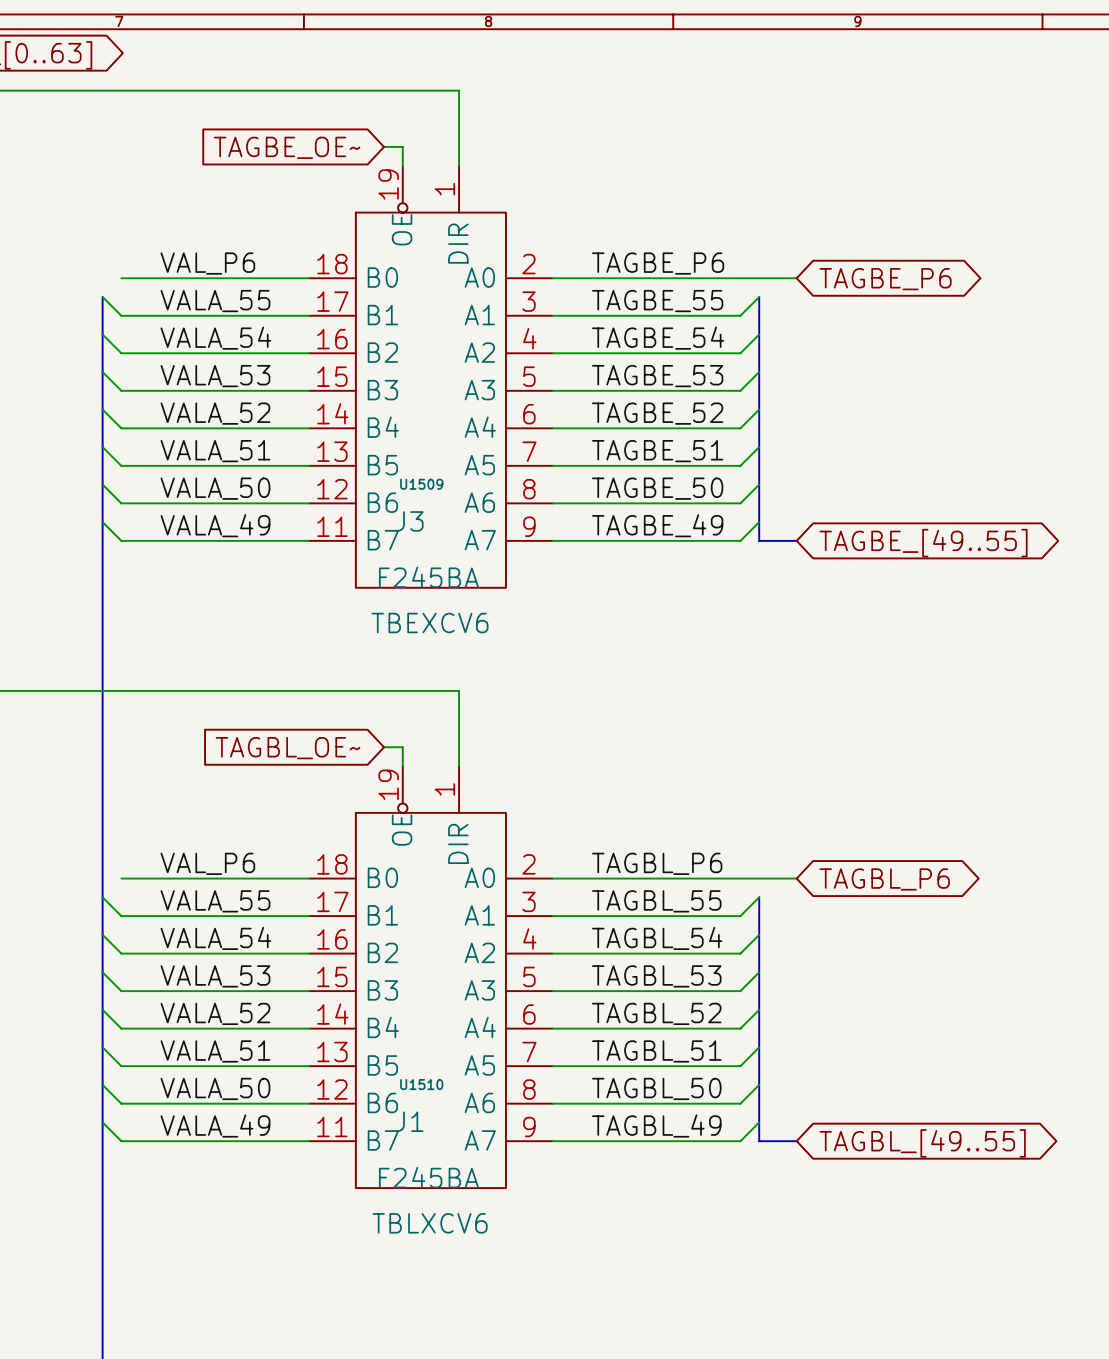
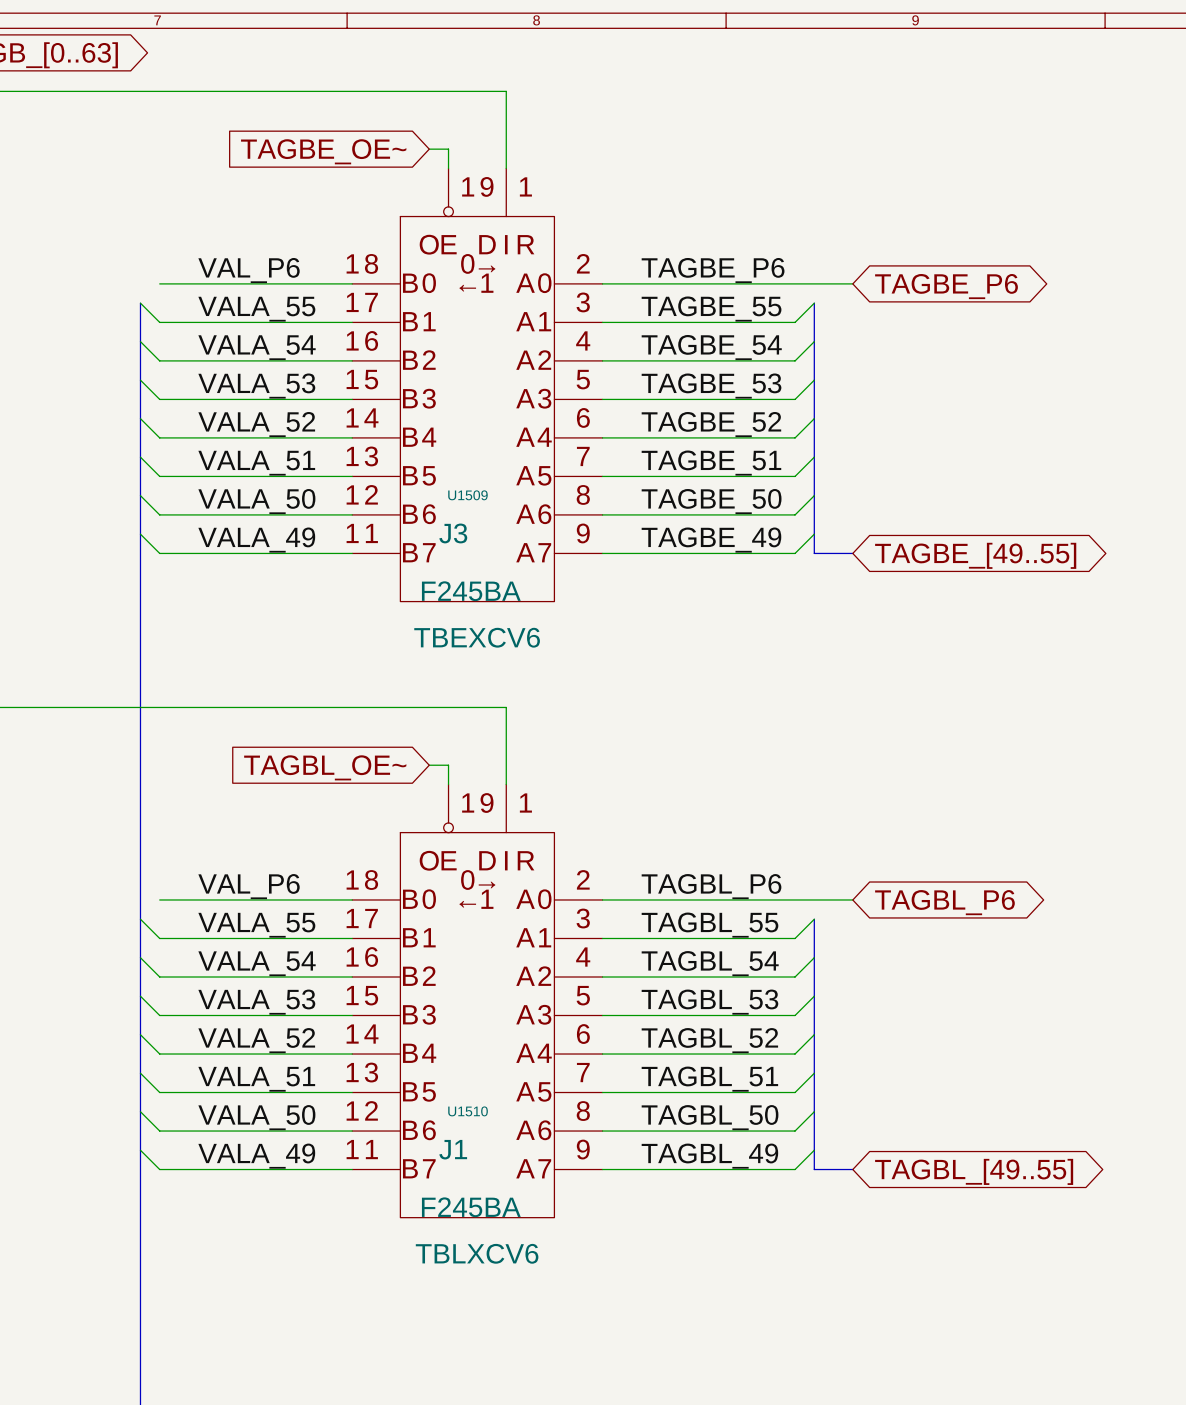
U1509 symbol: [308, 165, 553, 588] -> [352, 168, 603, 602]
U1510 symbol: [308, 766, 553, 1189] -> [352, 784, 603, 1218]

